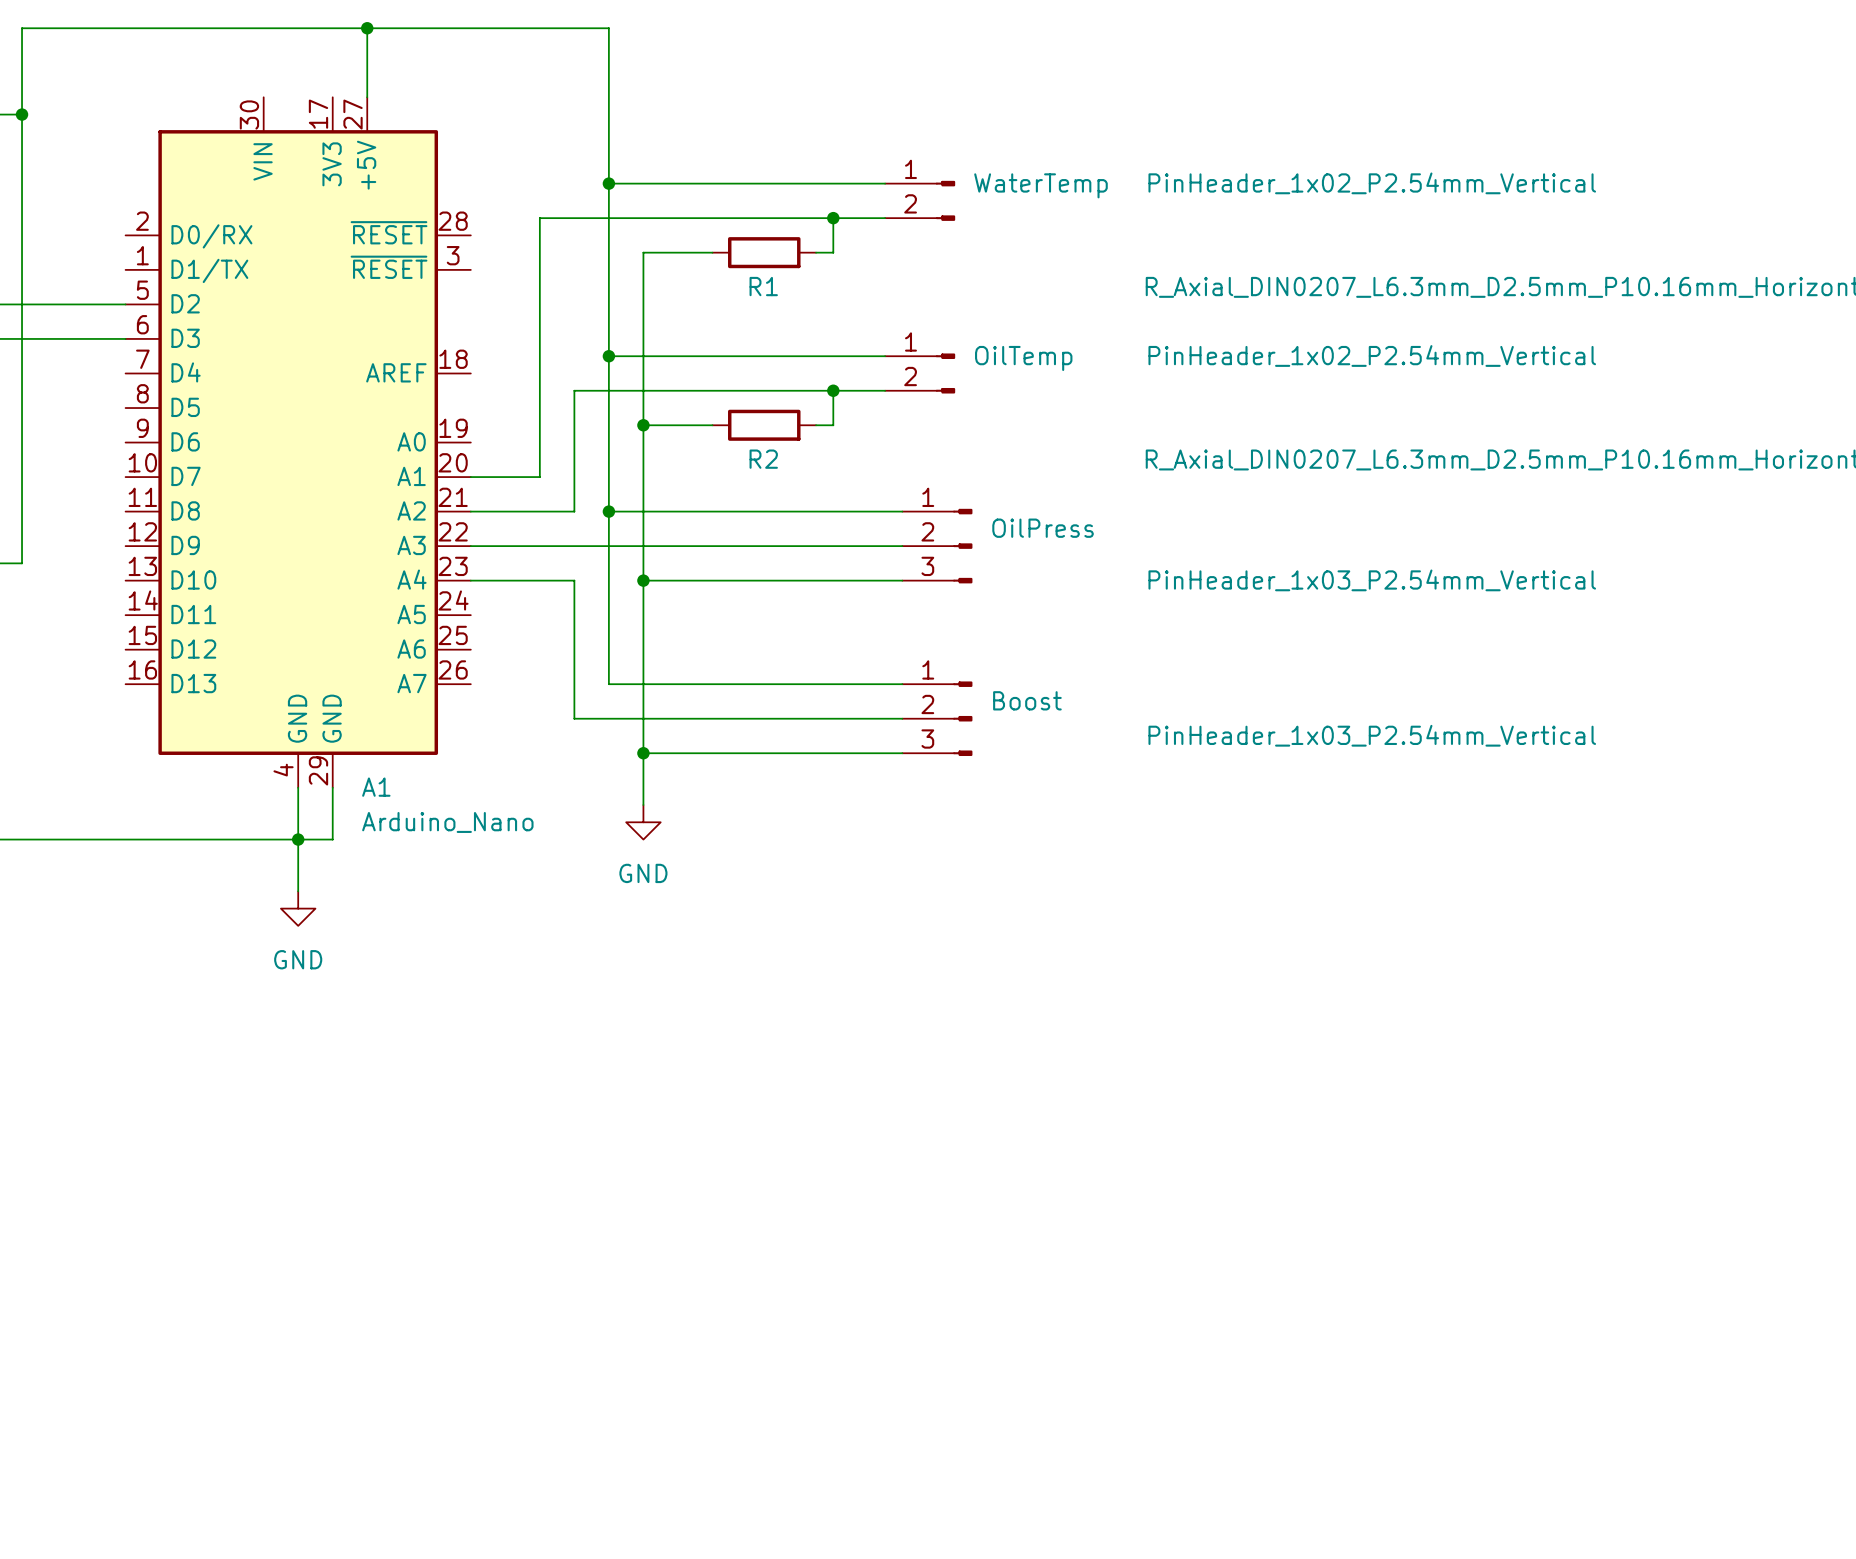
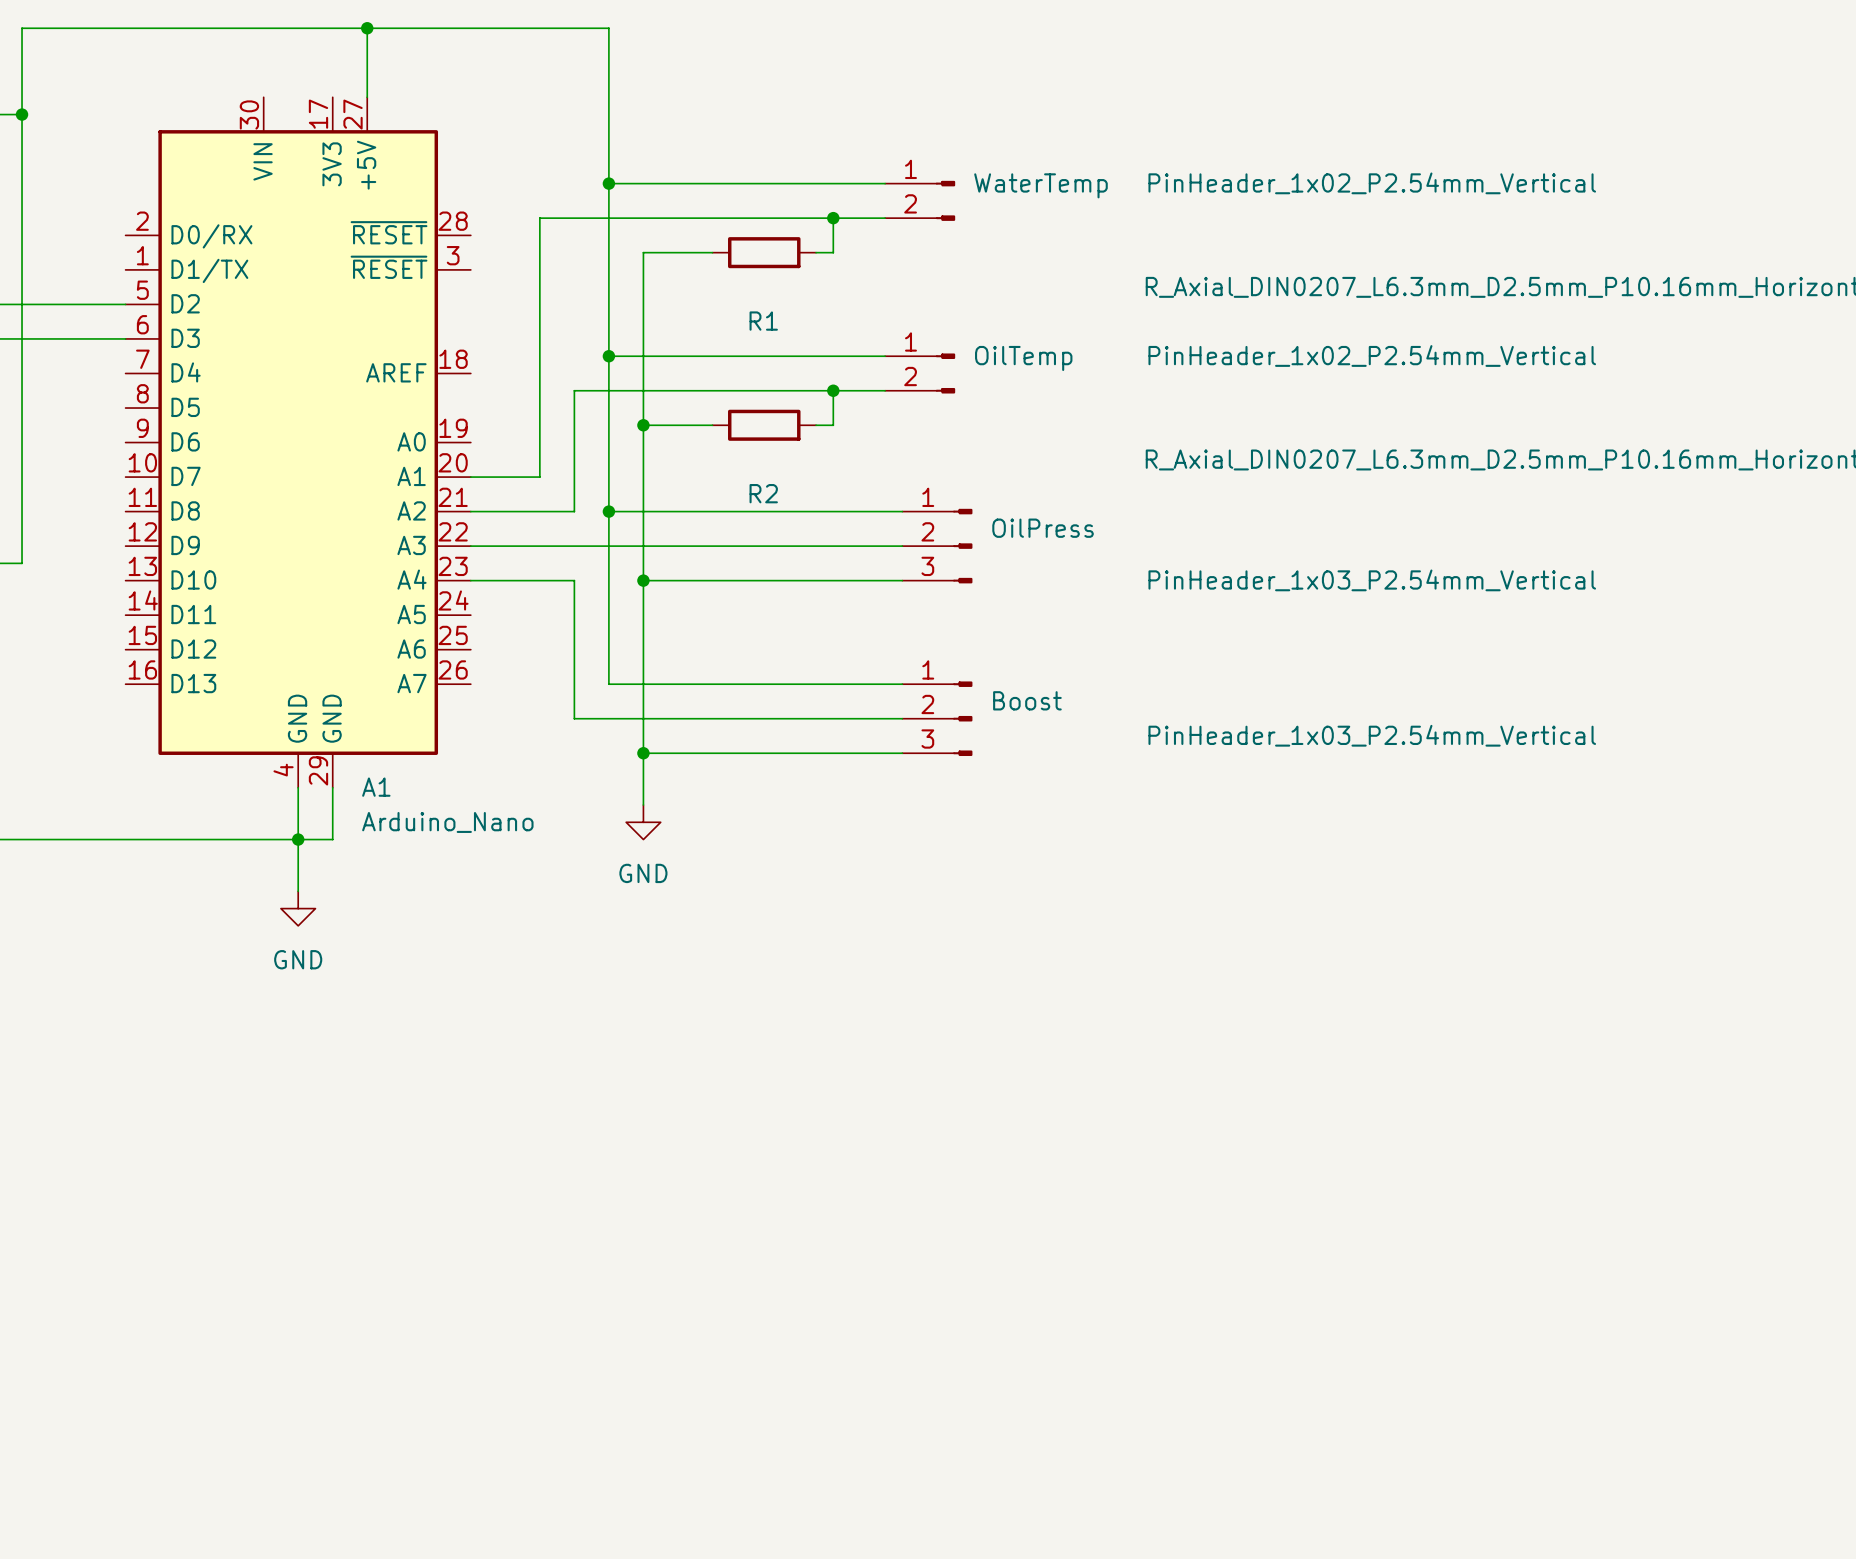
R1 name position: R1 (763, 286) -> R1 (763, 321)
R2 name position: R2 (763, 459) -> R2 (763, 493)

